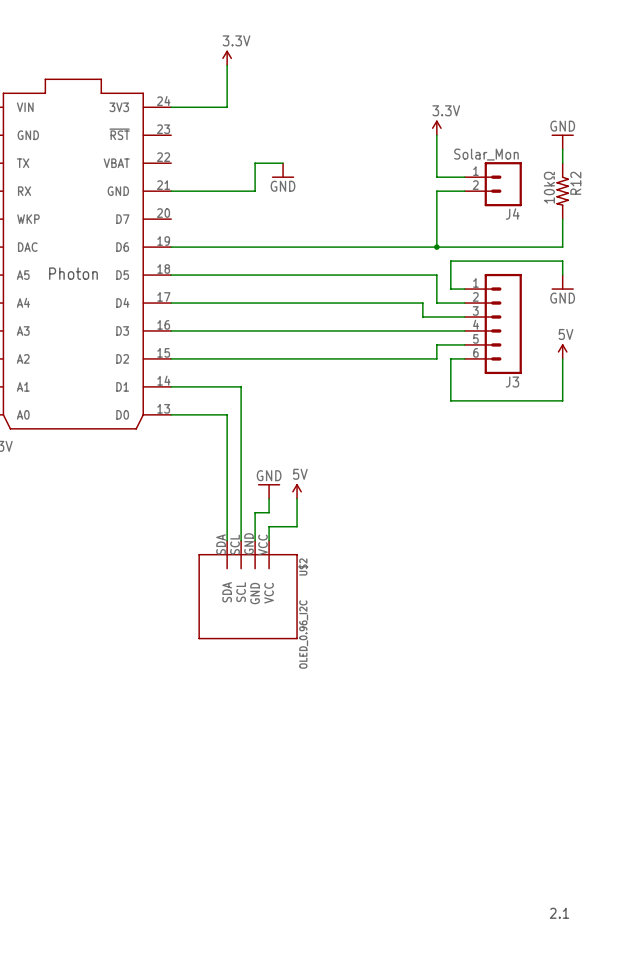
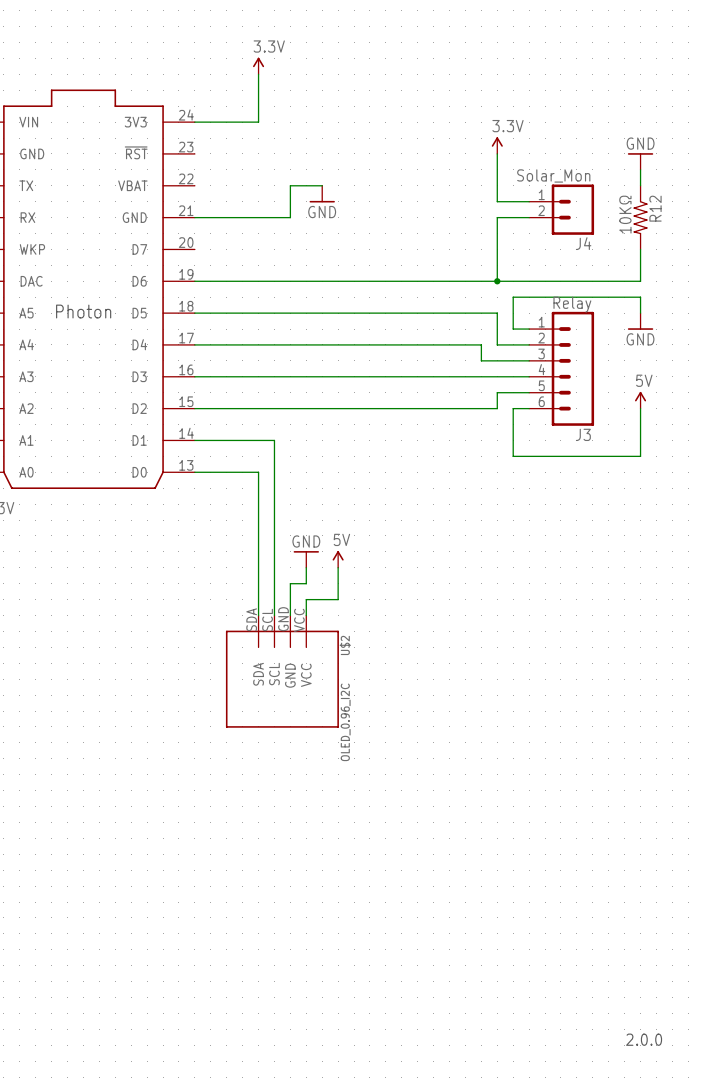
R12 value: 10kΩ (549, 187) -> 10KΩ (625, 214)
J3 value: none -> Relay (572, 304)
text: 2.1 (559, 913) -> 2.0.0 (644, 1039)

